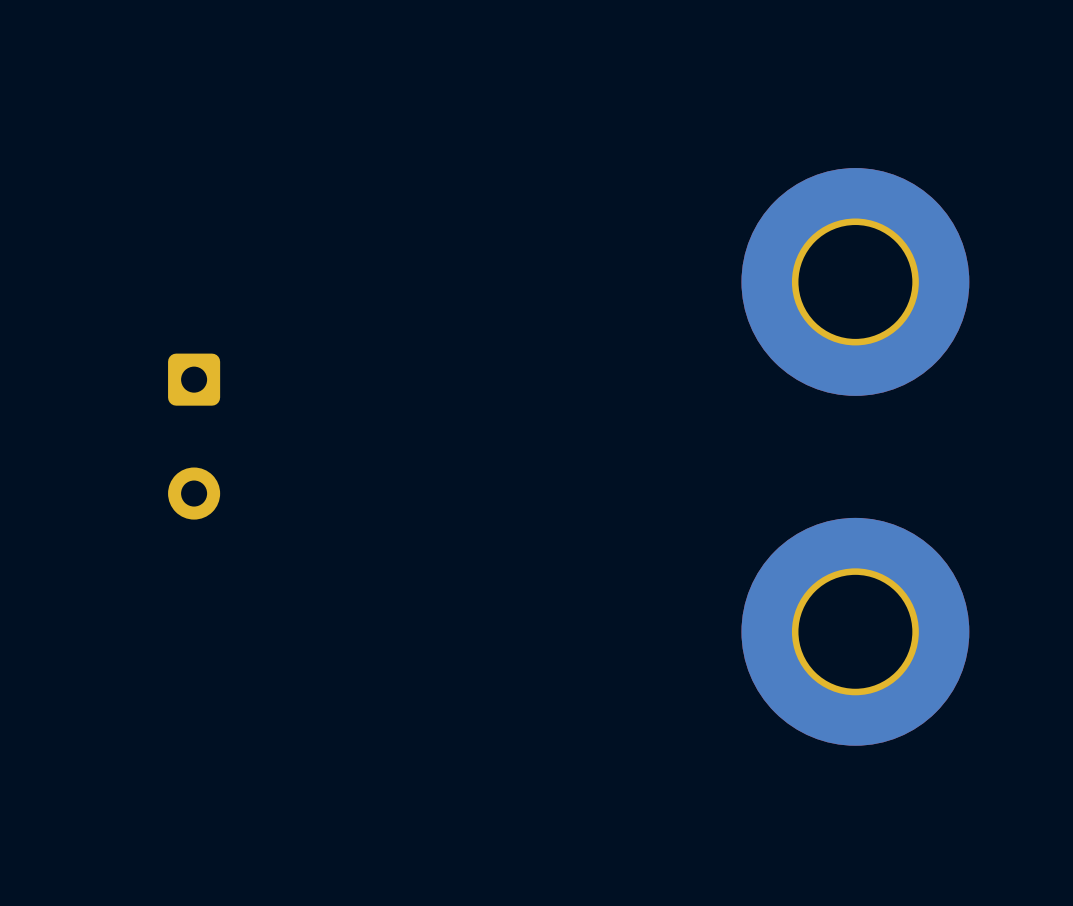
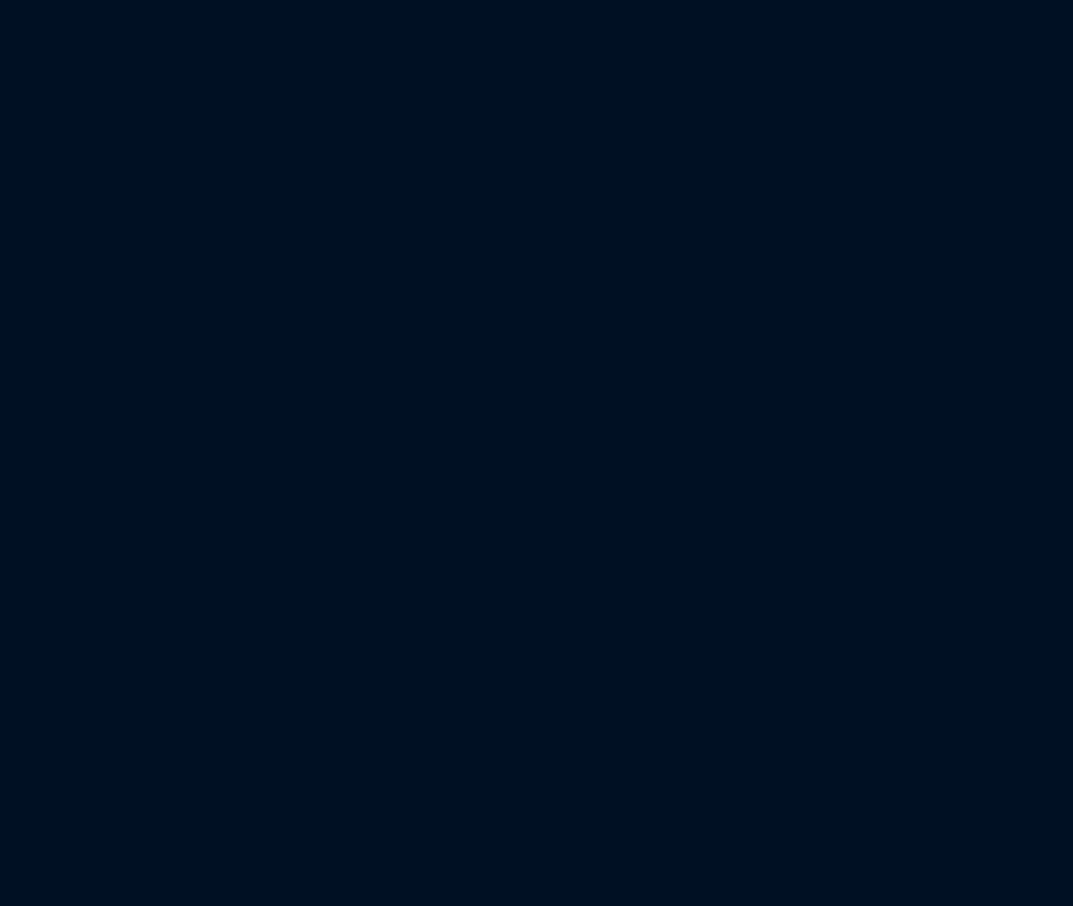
part: (855, 281) -> none
part: (194, 436) -> none
part: (855, 631) -> none

